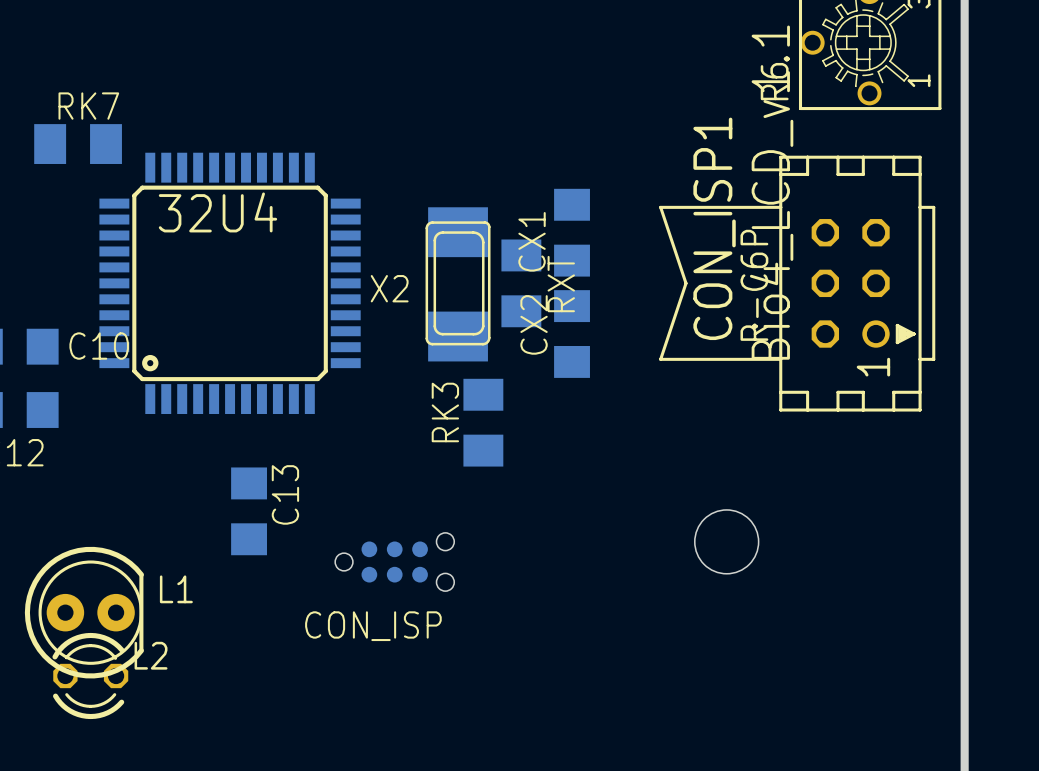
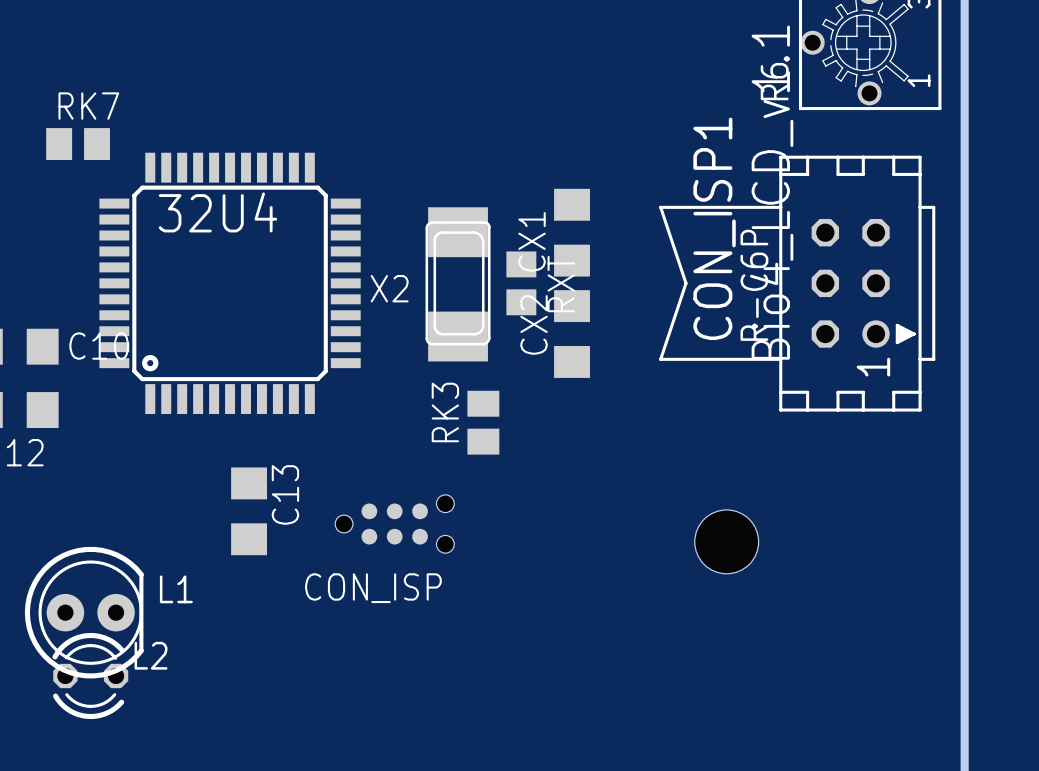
RK7 footprint: [34, 124, 122, 164] -> [46, 128, 110, 161]
RXT footprint: [501, 239, 542, 328] -> [506, 251, 537, 316]
RK3 footprint: [463, 378, 504, 467] -> [467, 390, 500, 455]
CON_ISP position: (394, 562) -> (394, 524)

